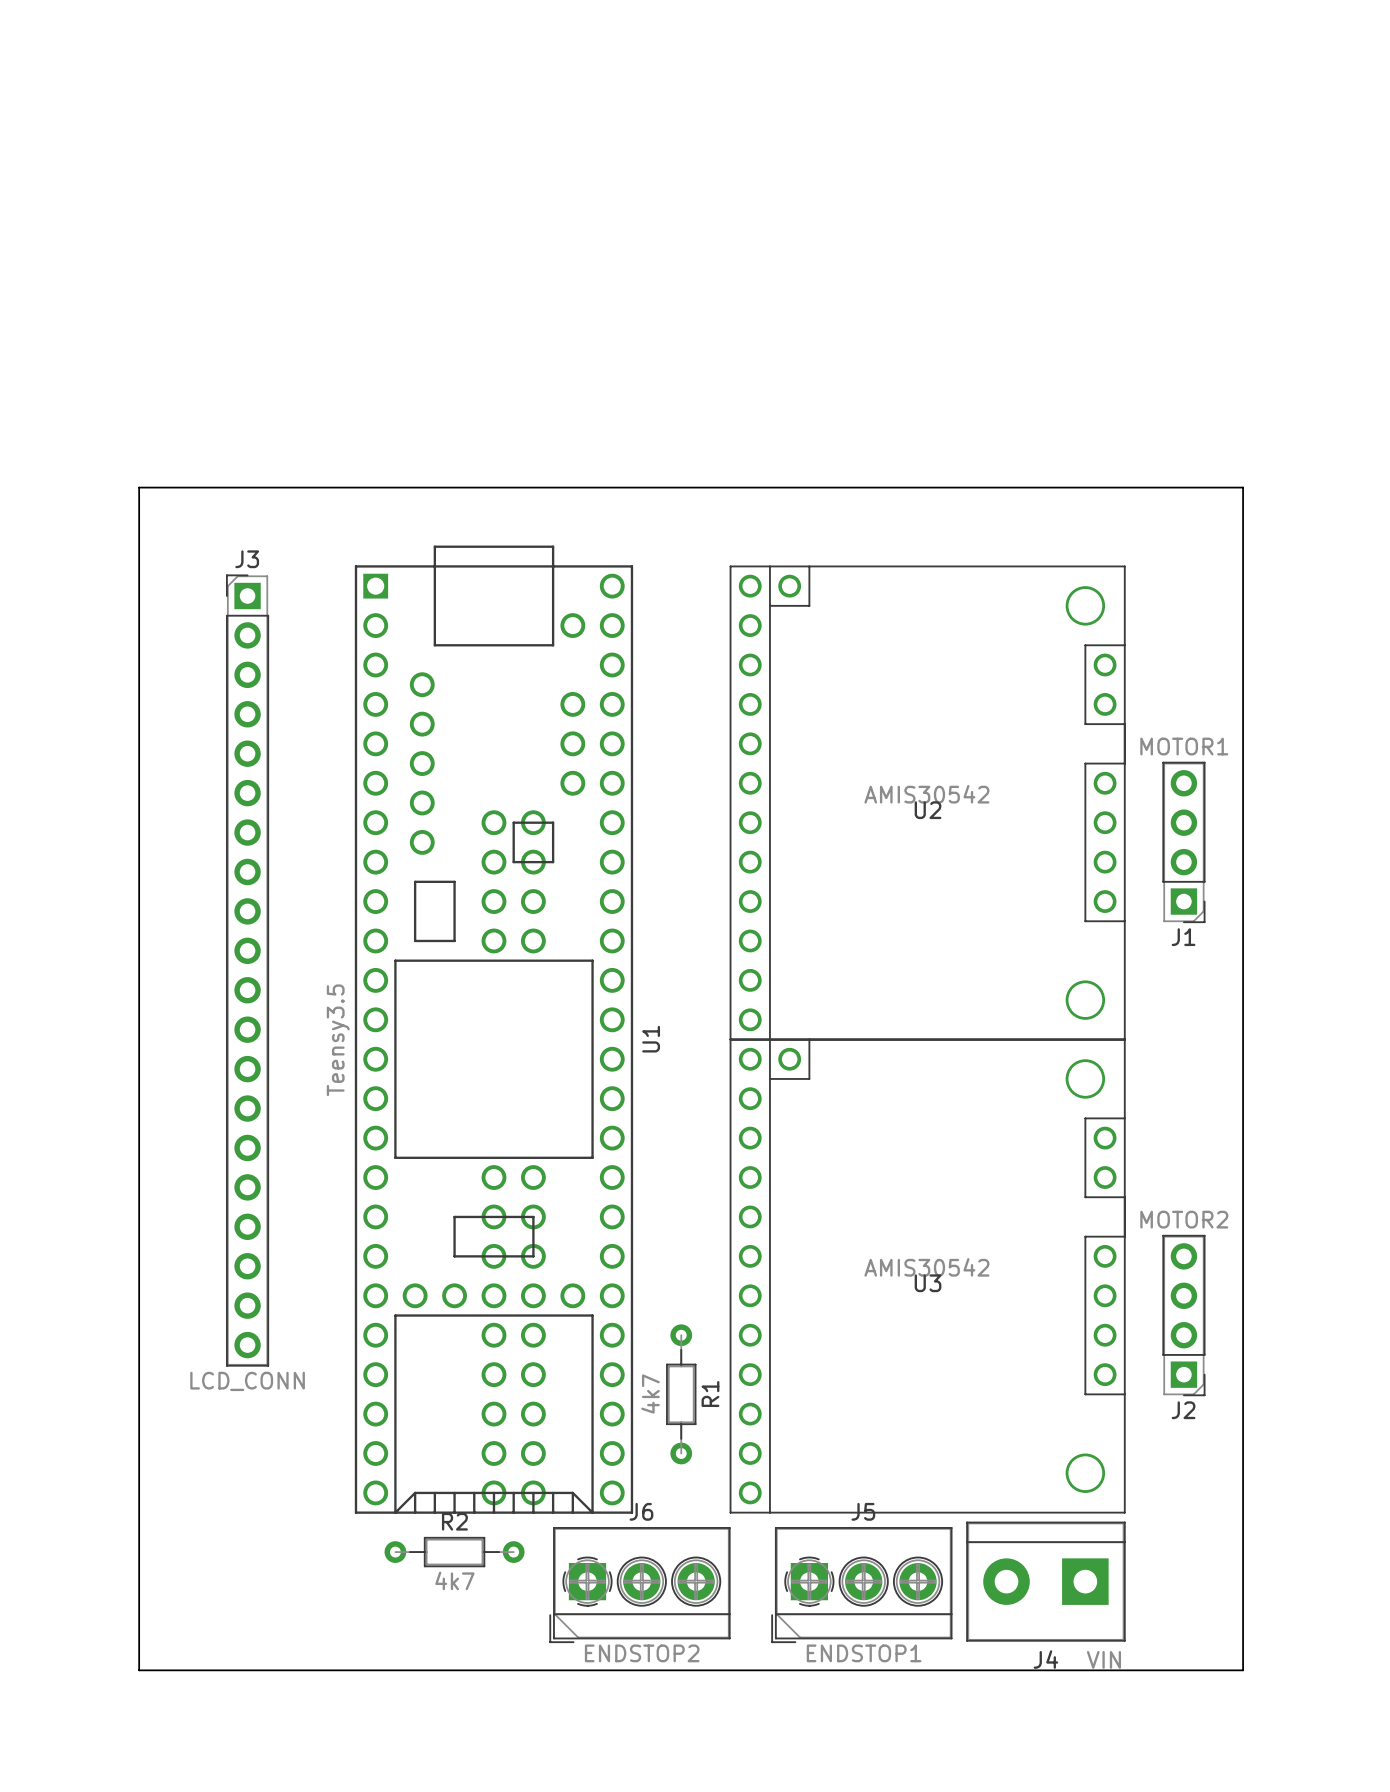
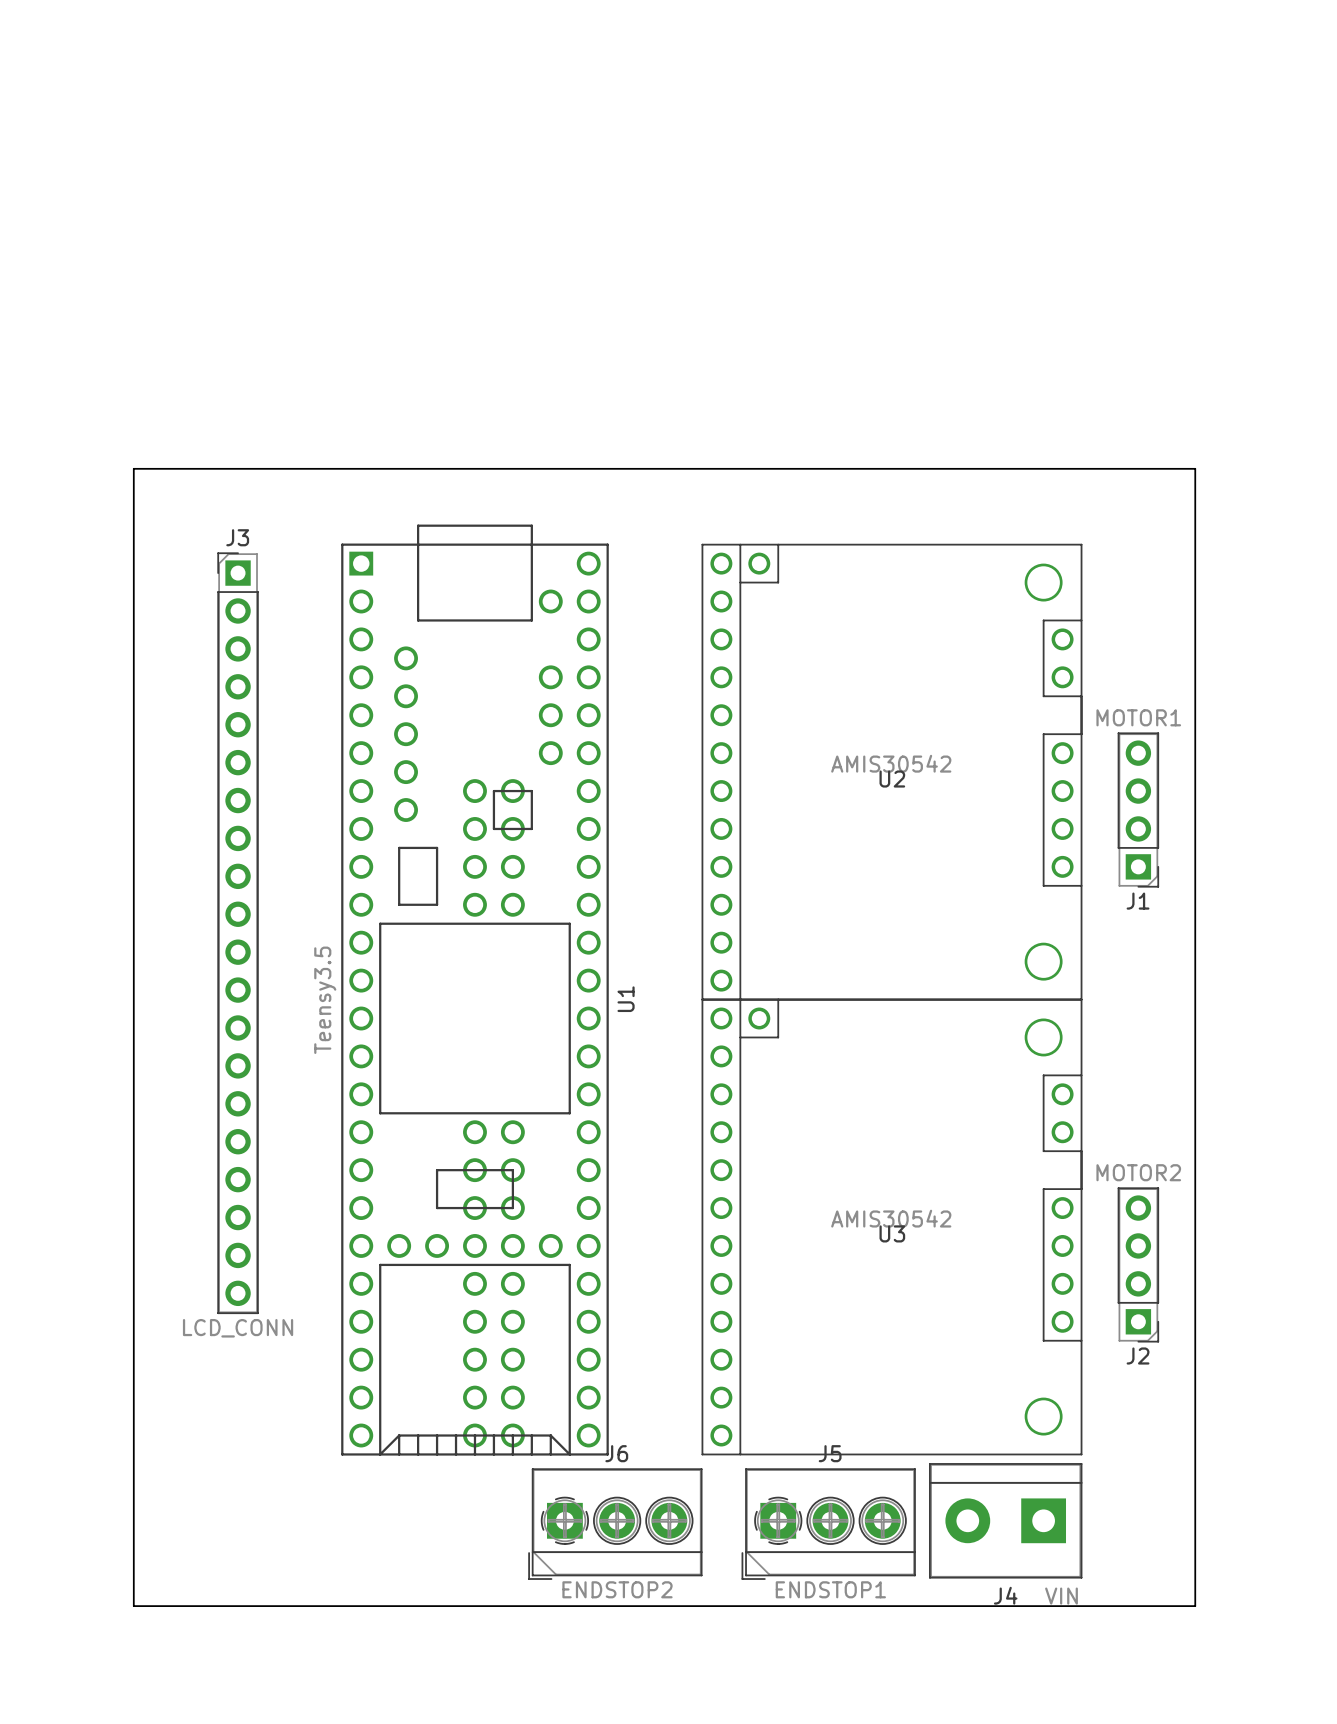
R1: 4k7 (681, 1394) -> none
R2: 4k7 (454, 1552) -> none

